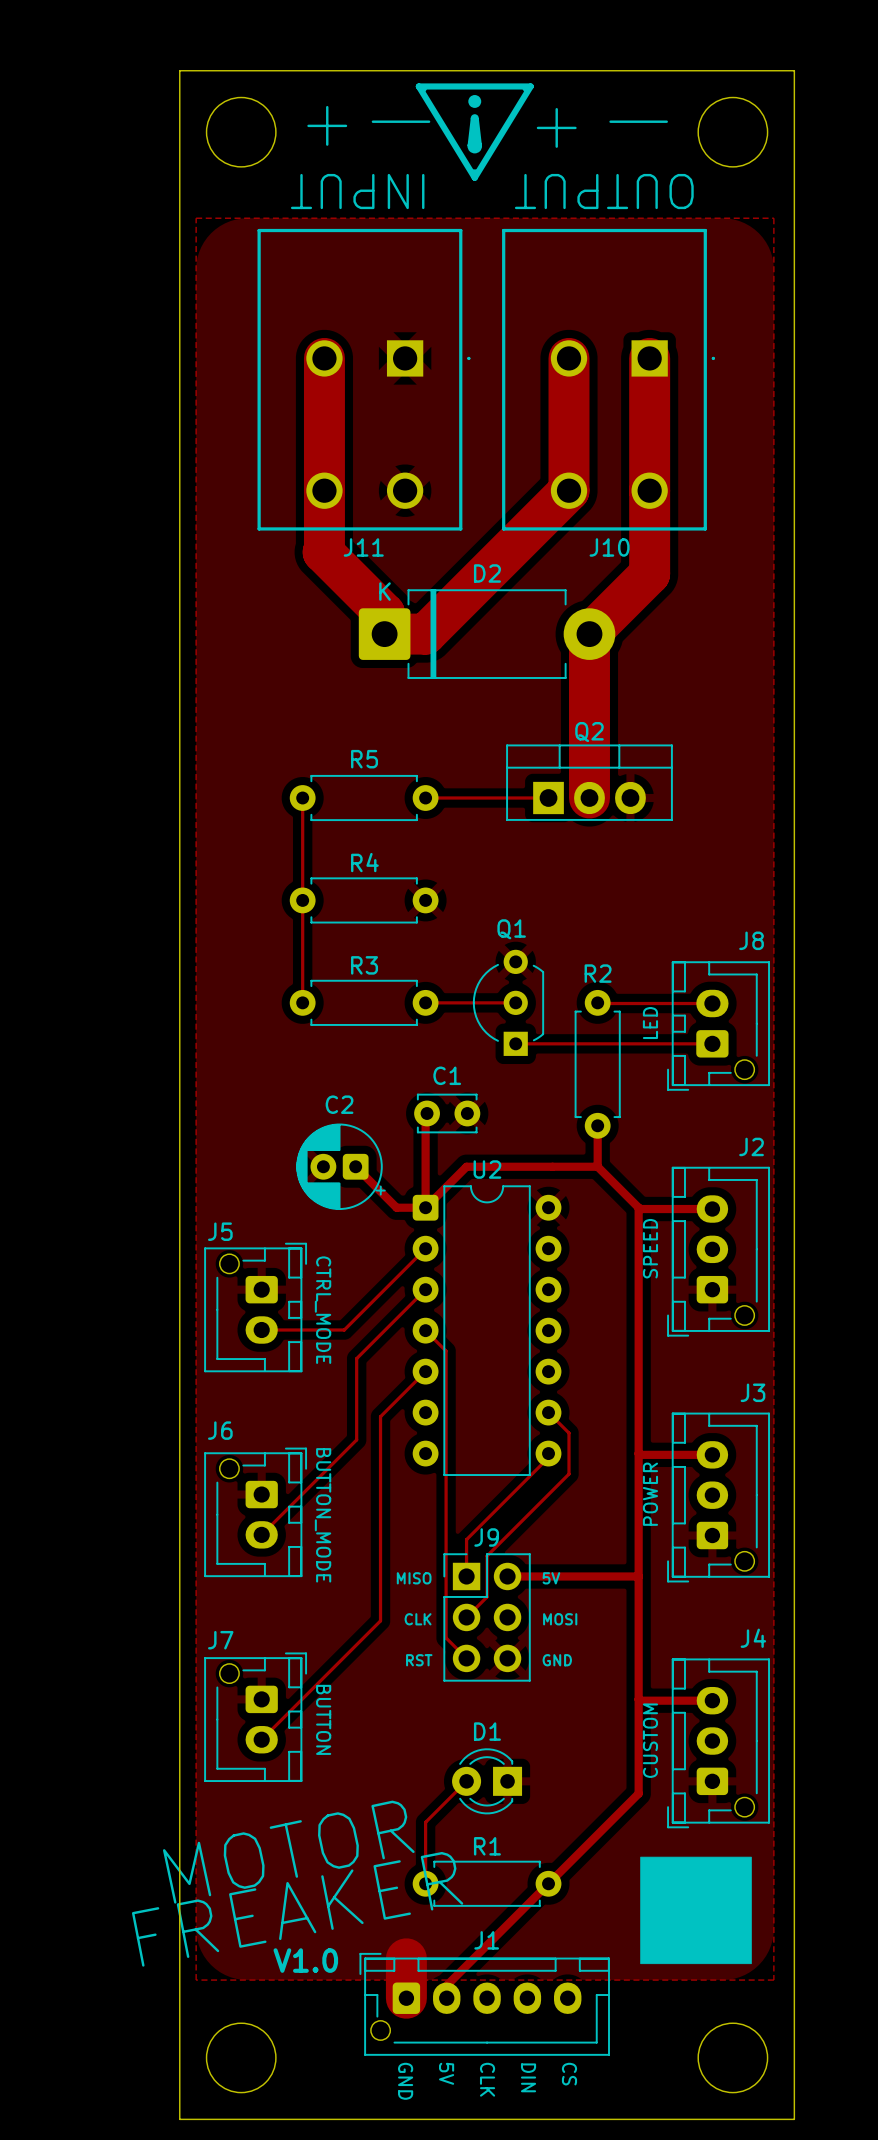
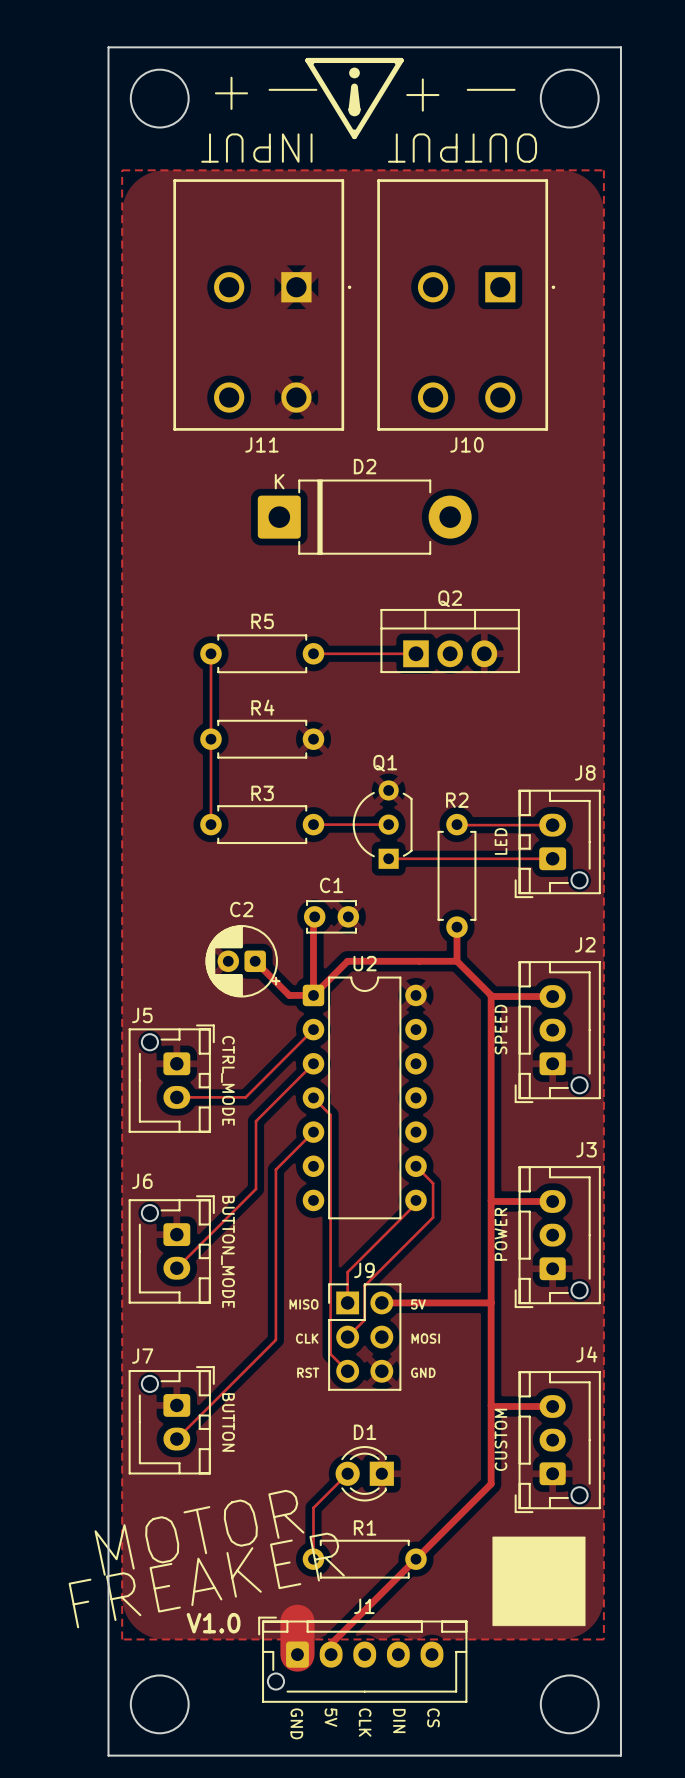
track: (324, 358) (323, 552) (384, 613) (384, 634) (425, 634) (569, 490) (569, 358) -> none
track: (649, 358) (649, 573) (589, 634) (589, 798) -> none

